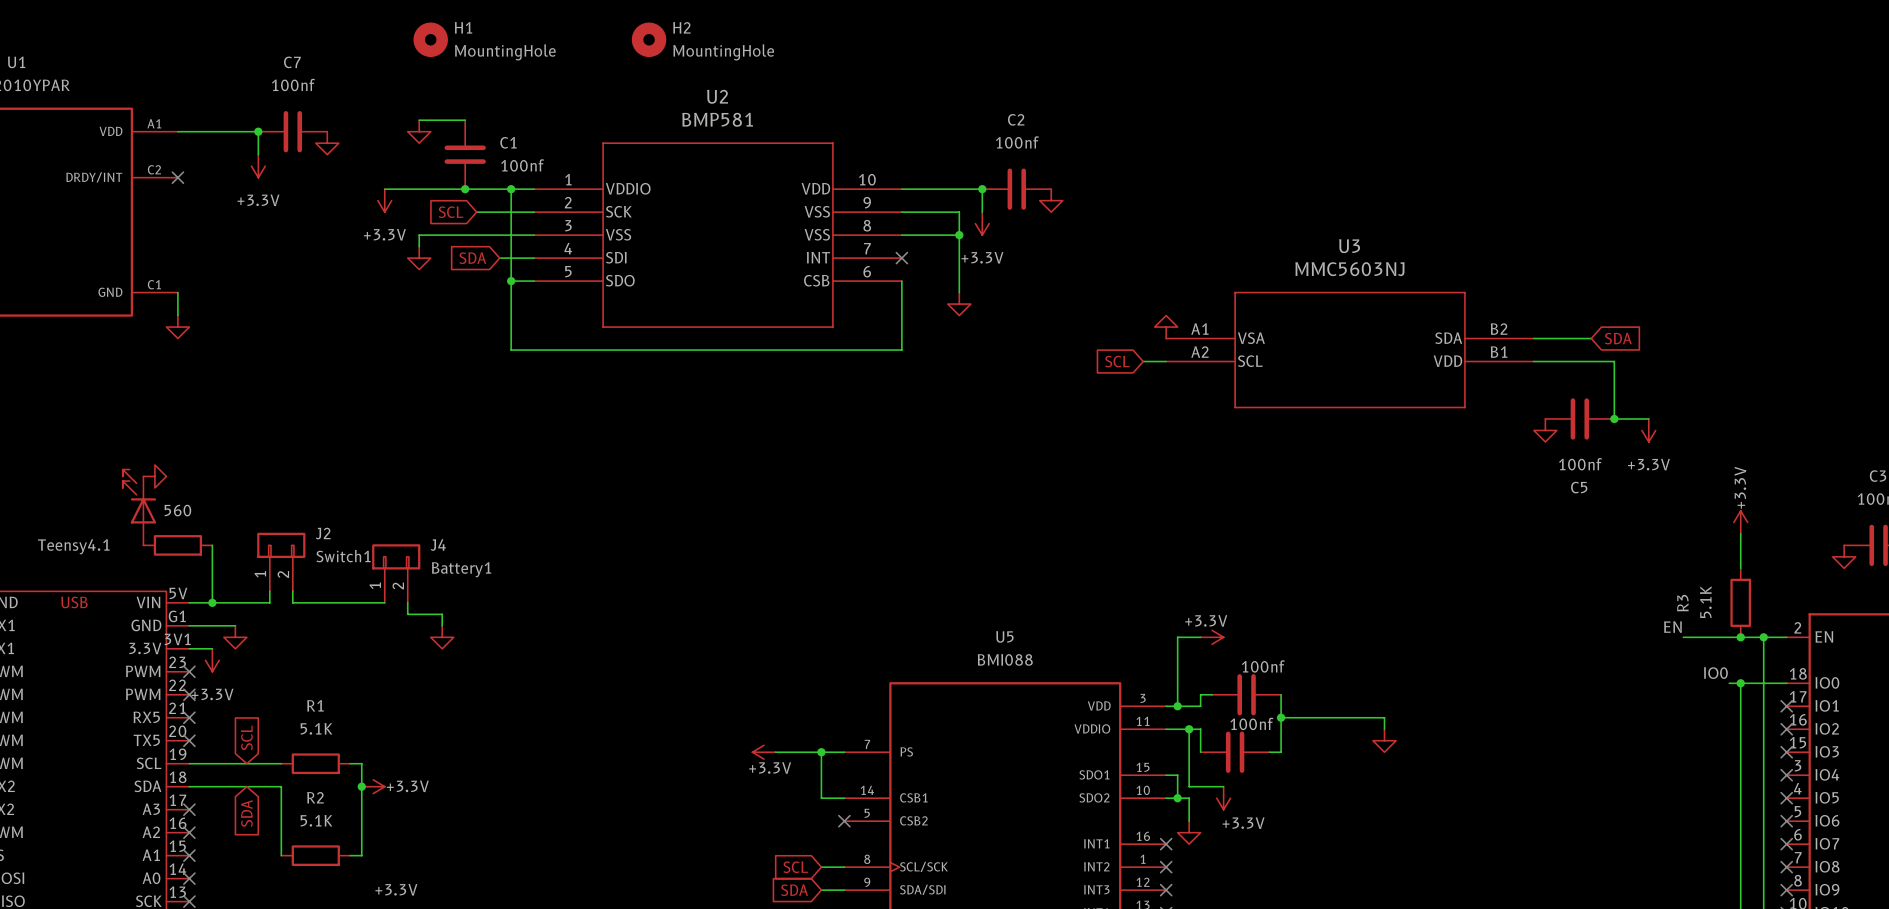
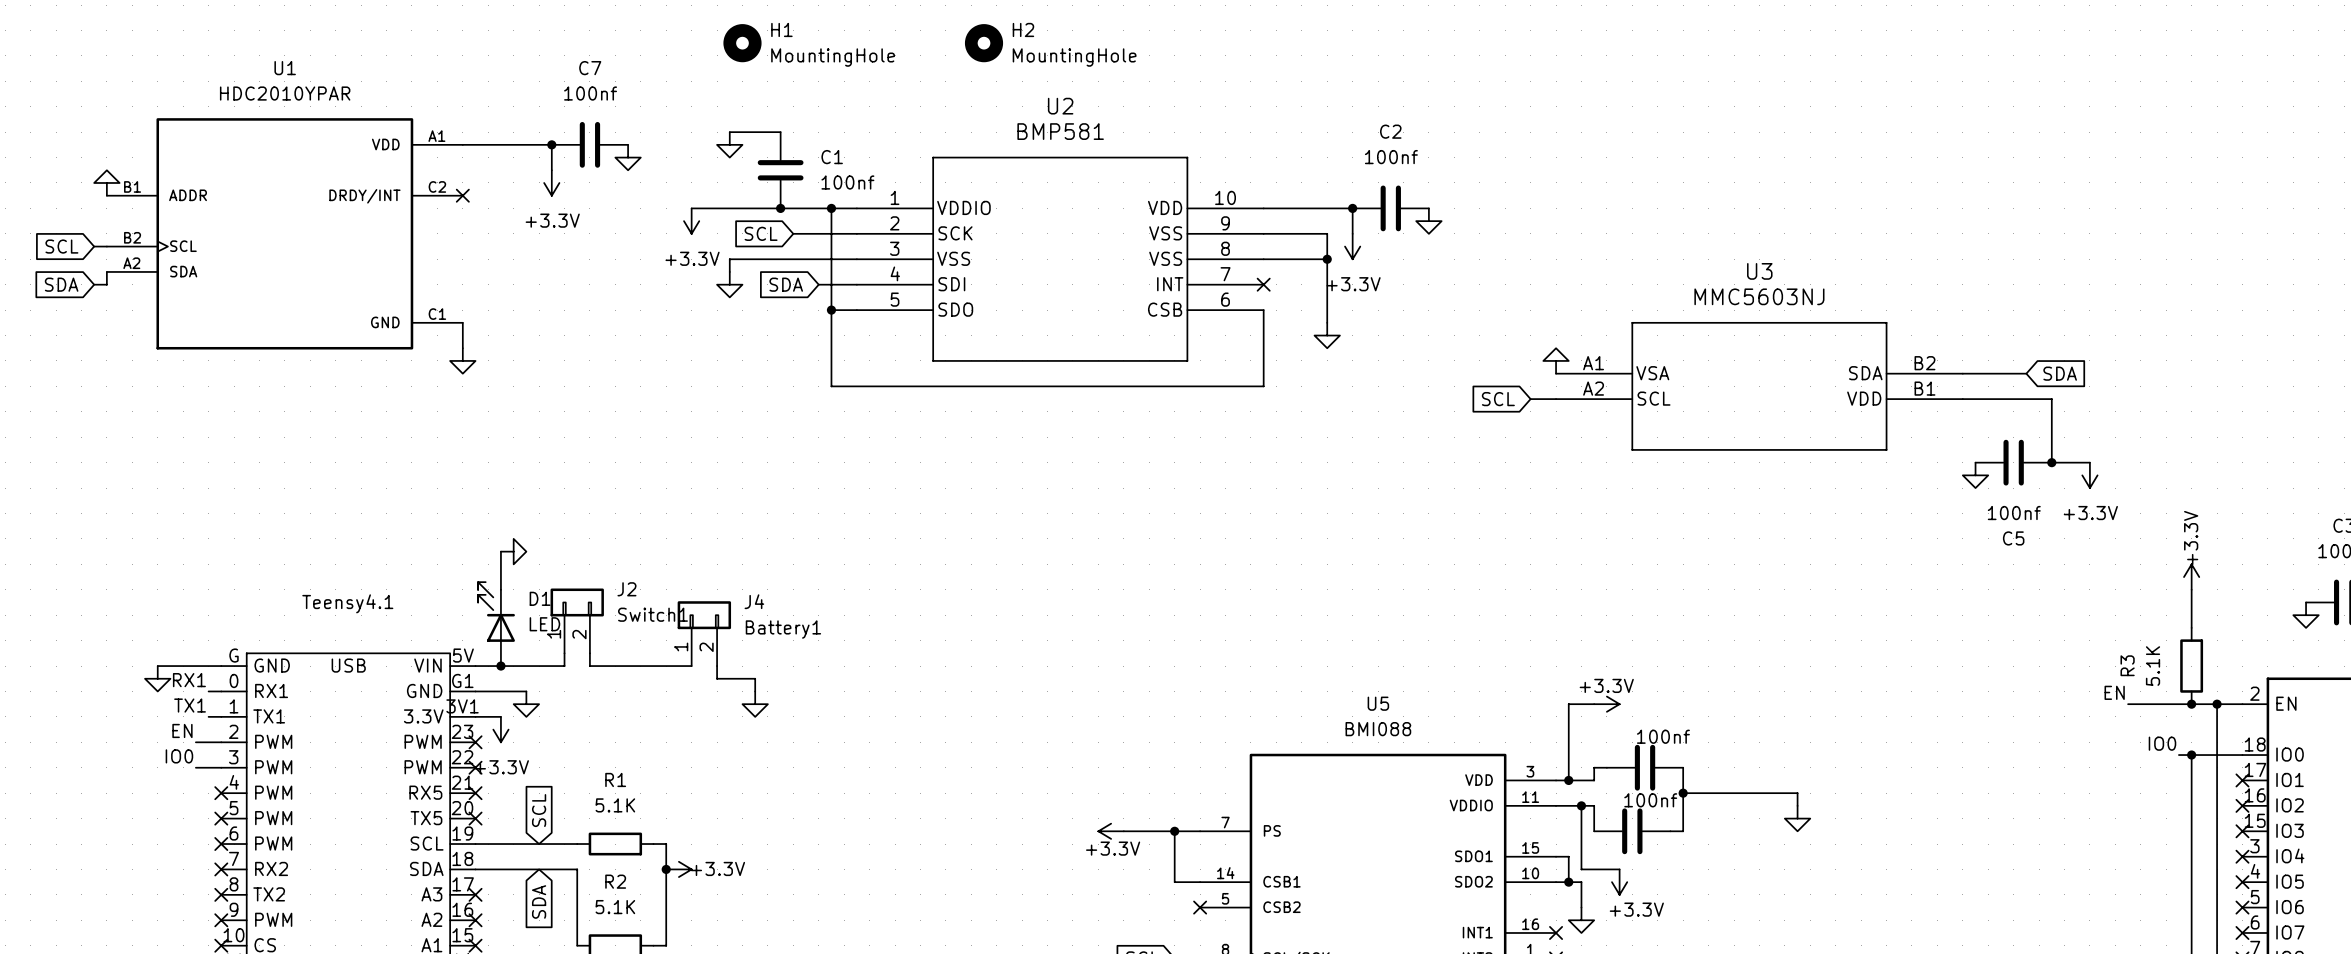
power symbol position: (154, 476) -> (513, 551)
wire: none -> (500, 551) (500, 589)
part: (139, 507) -> none
part: 560 (177, 545) -> none
D1: none -> LED (496, 624)

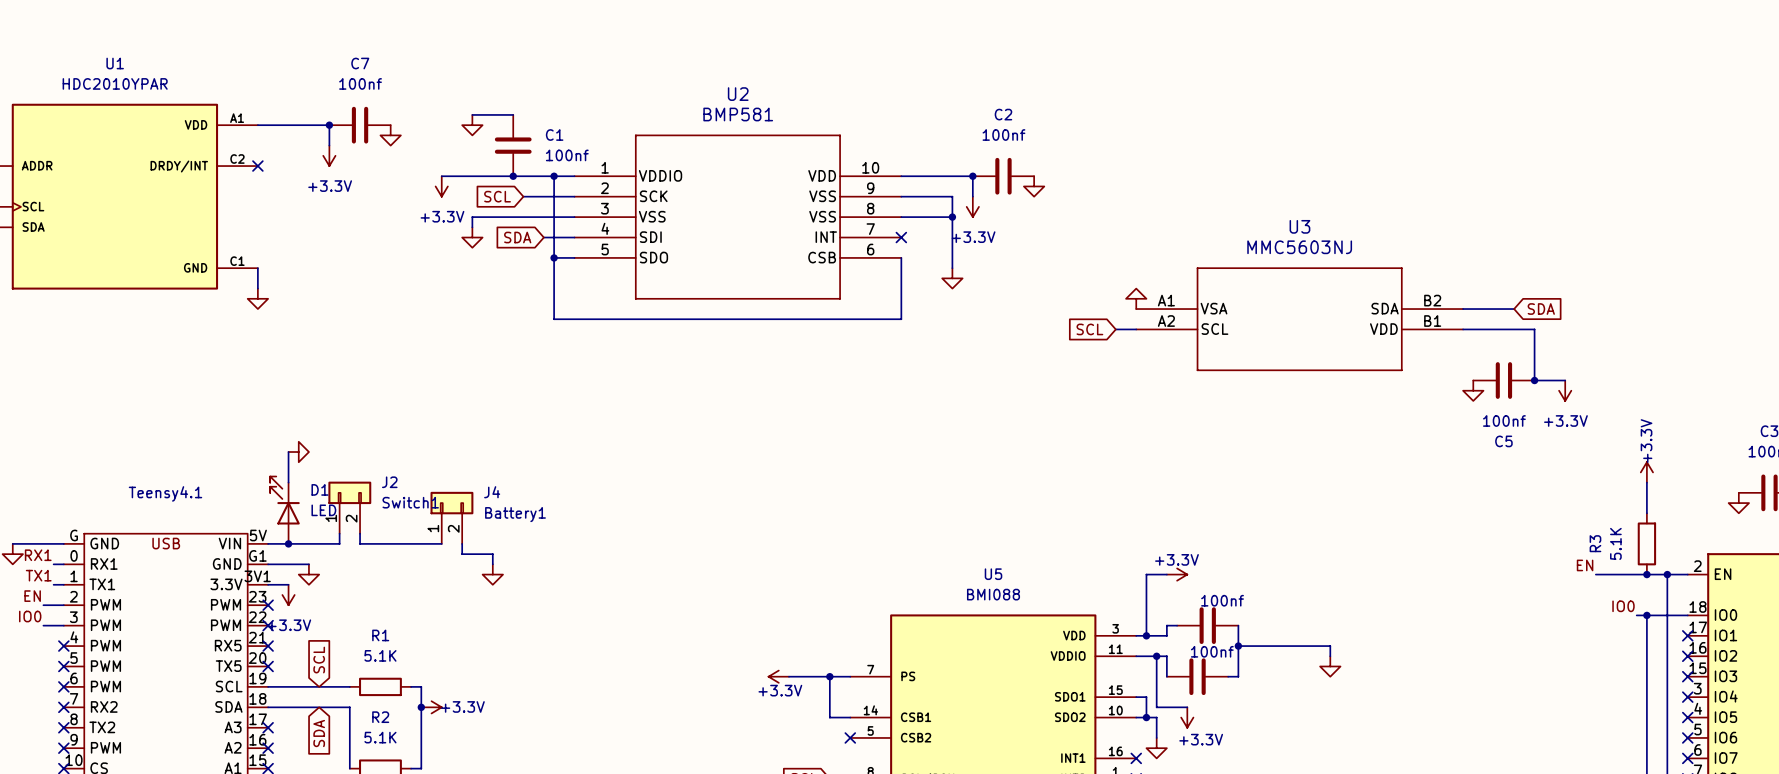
H1: MountingHole (742, 43) -> none
H2: MountingHole (984, 43) -> none

